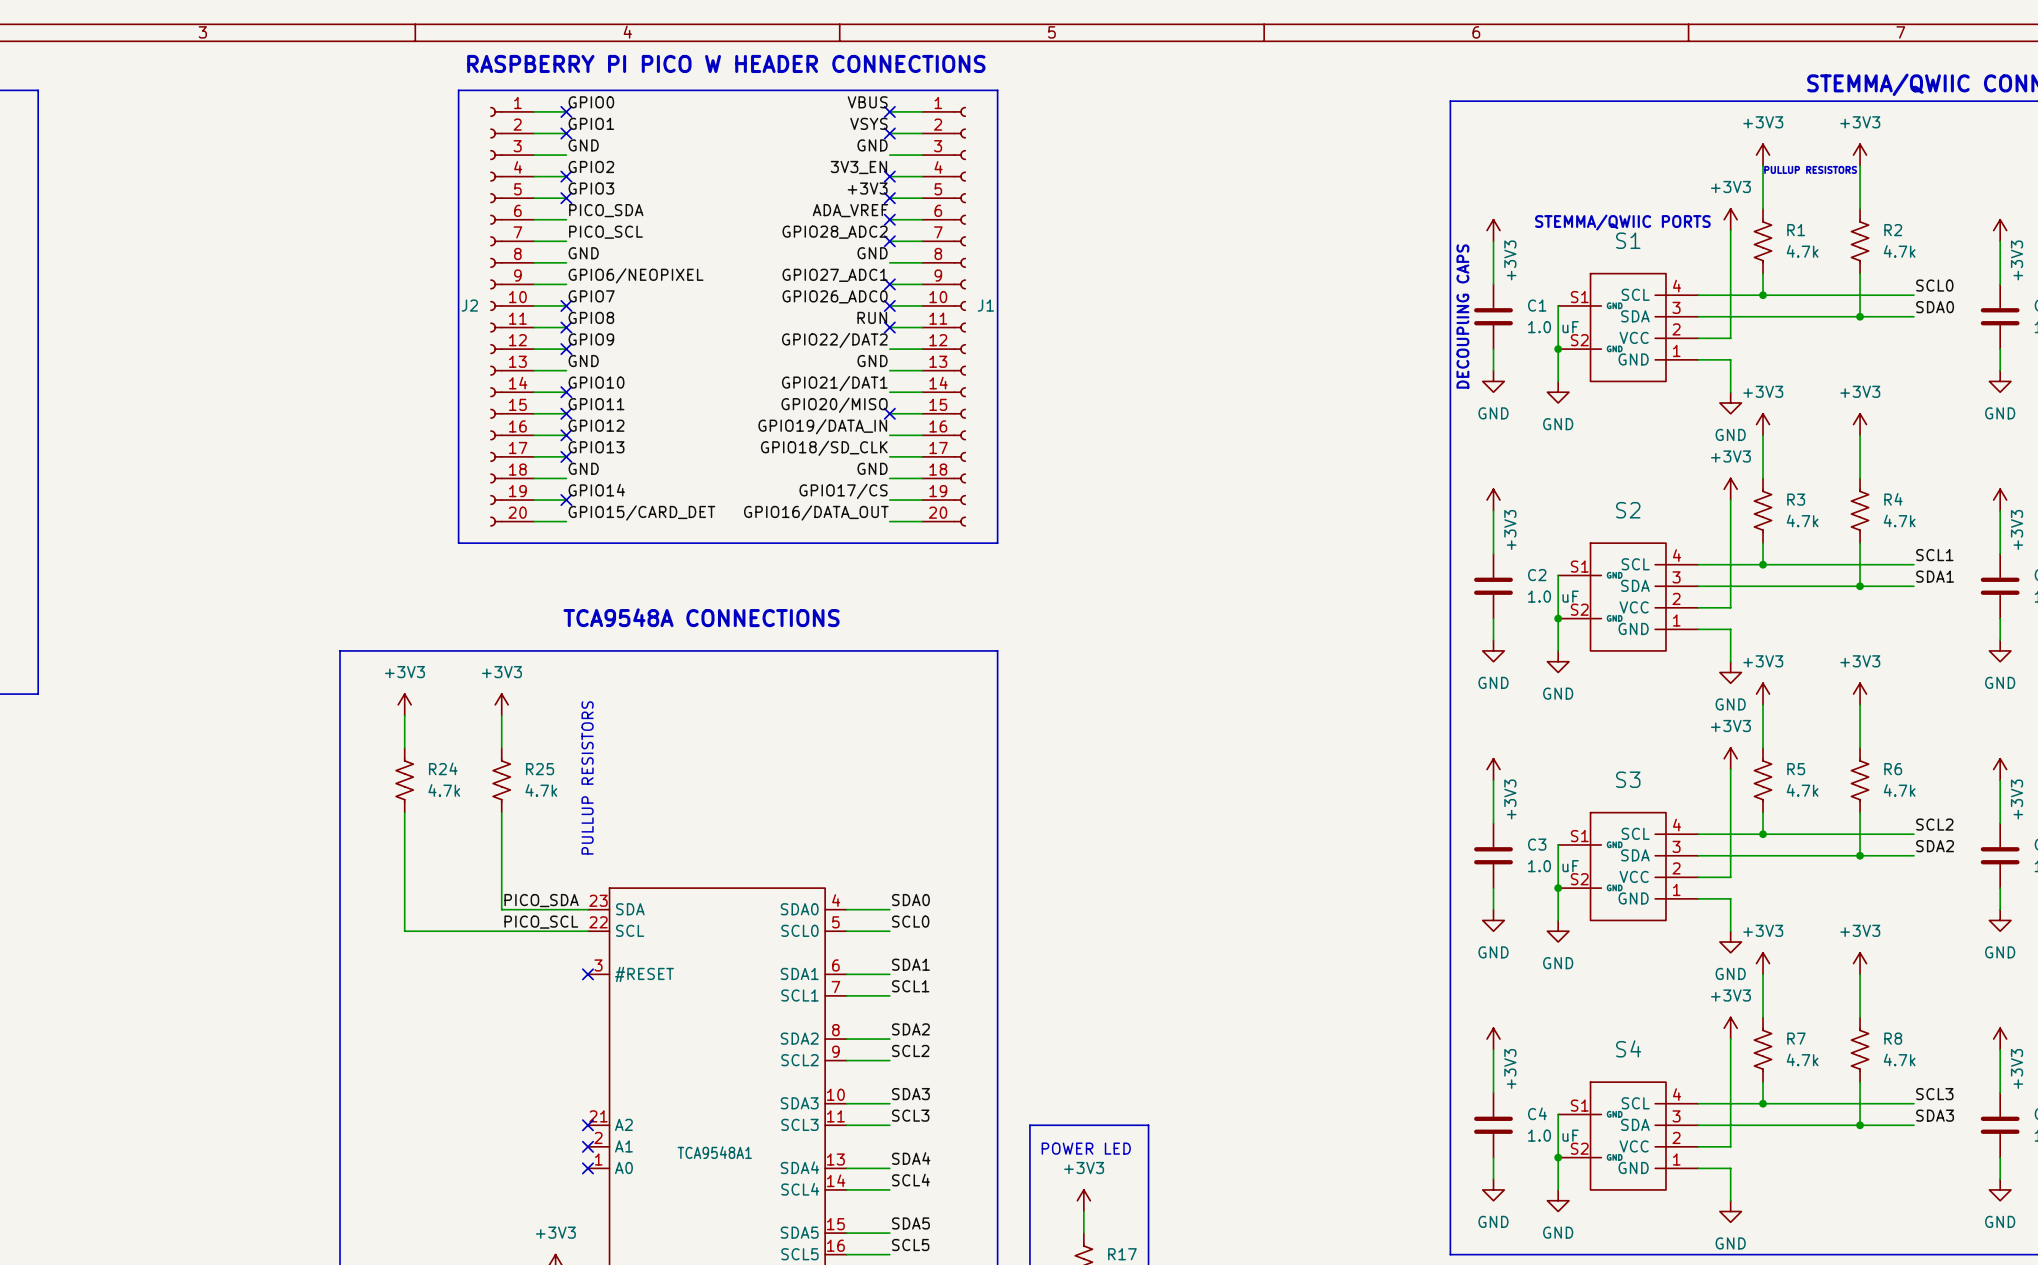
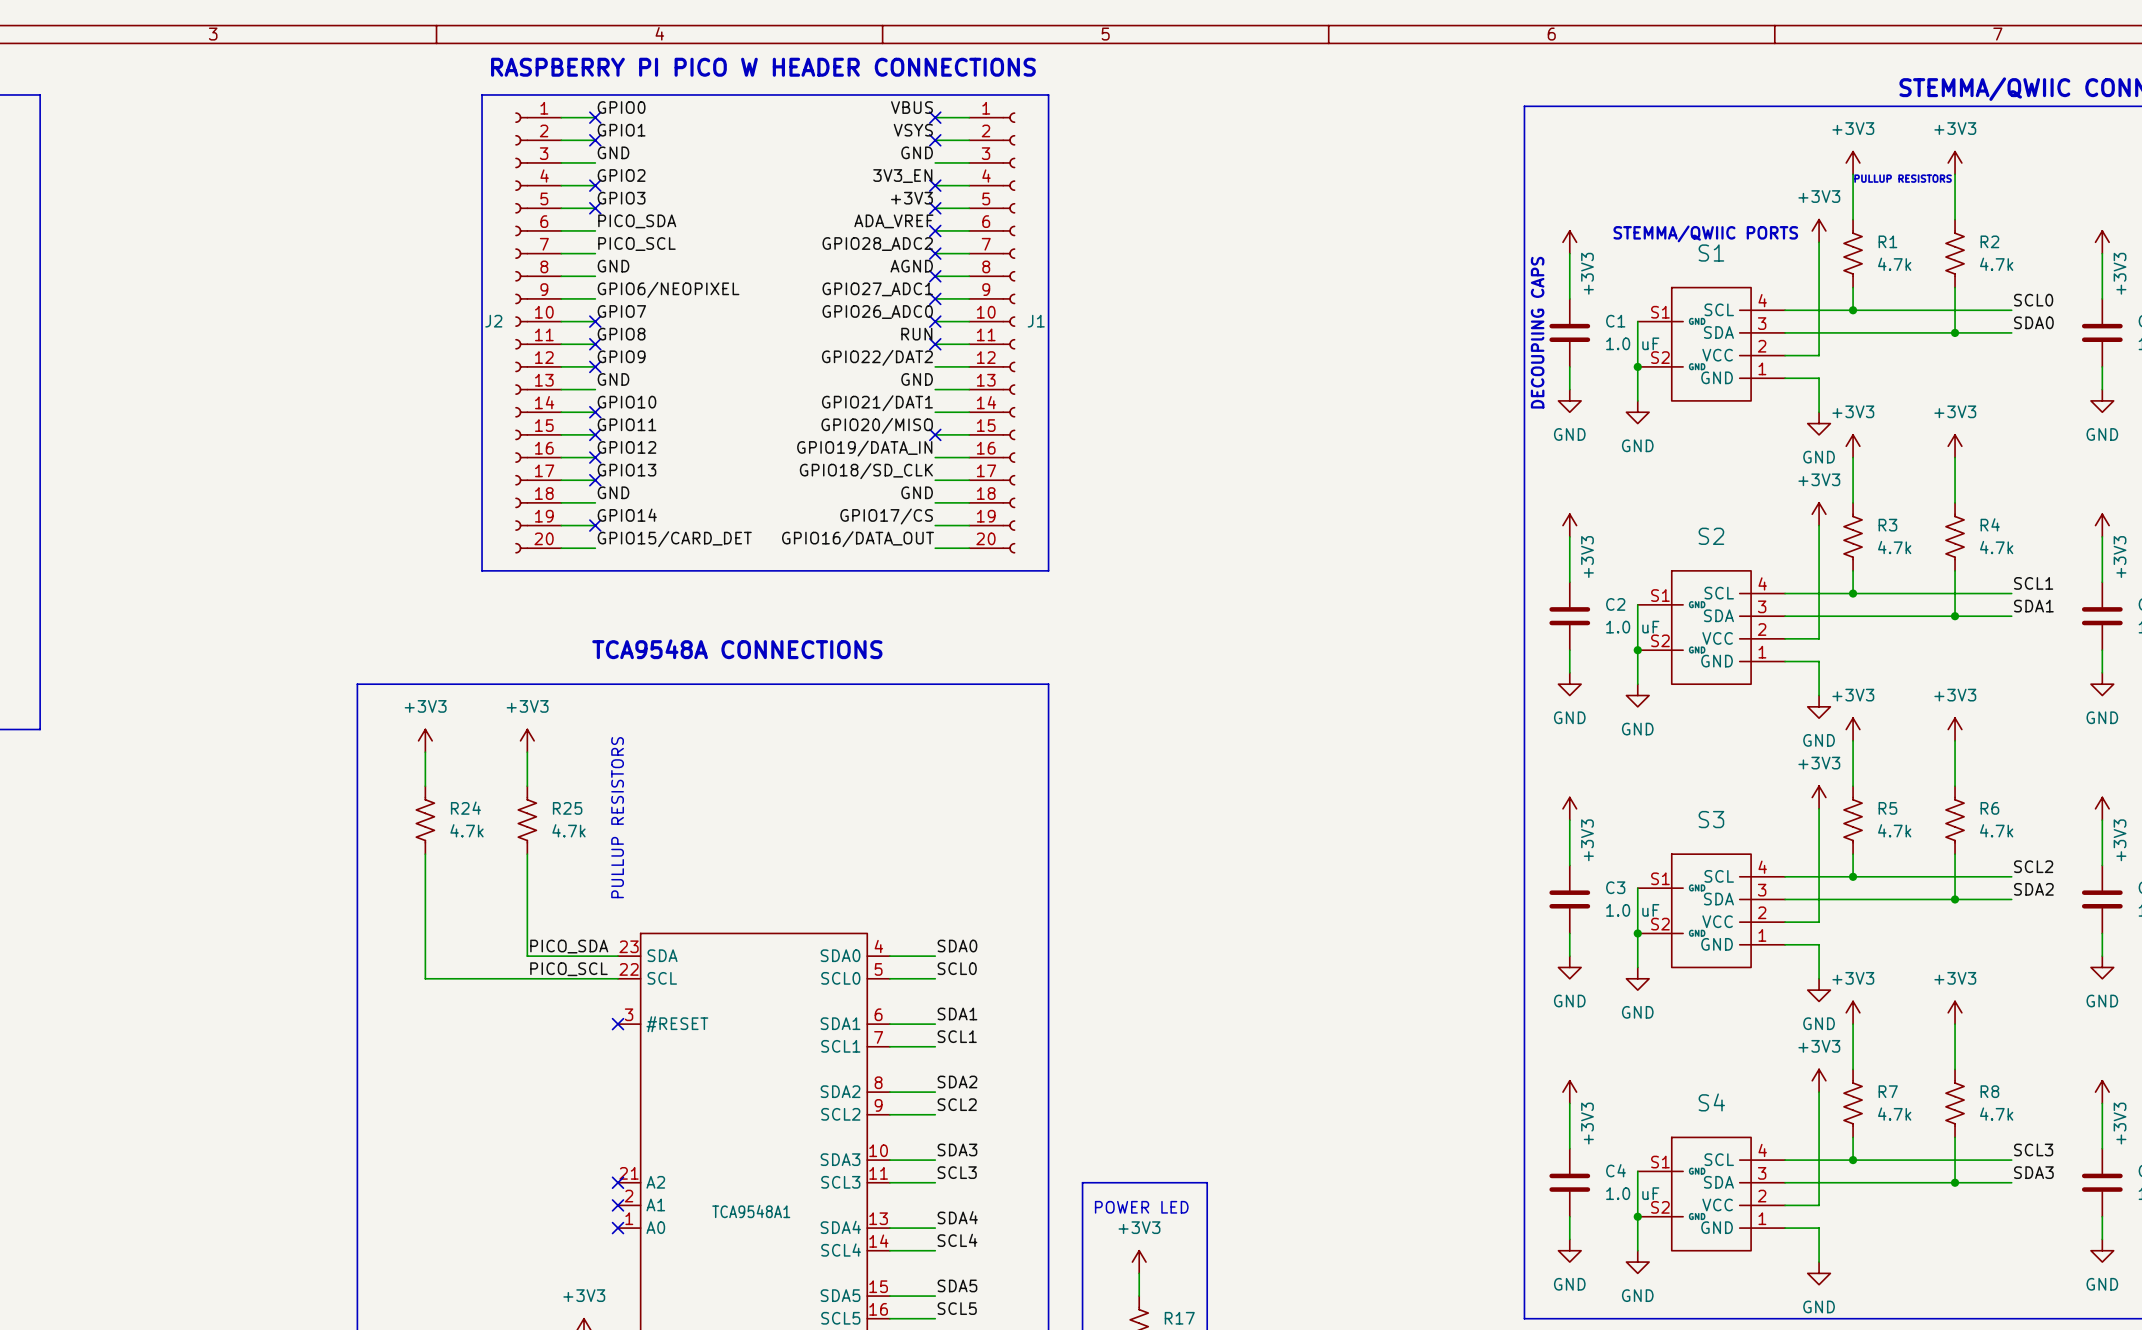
label: GND (872, 253) -> AGND (911, 266)
no-connect mark: none -> (935, 276)

